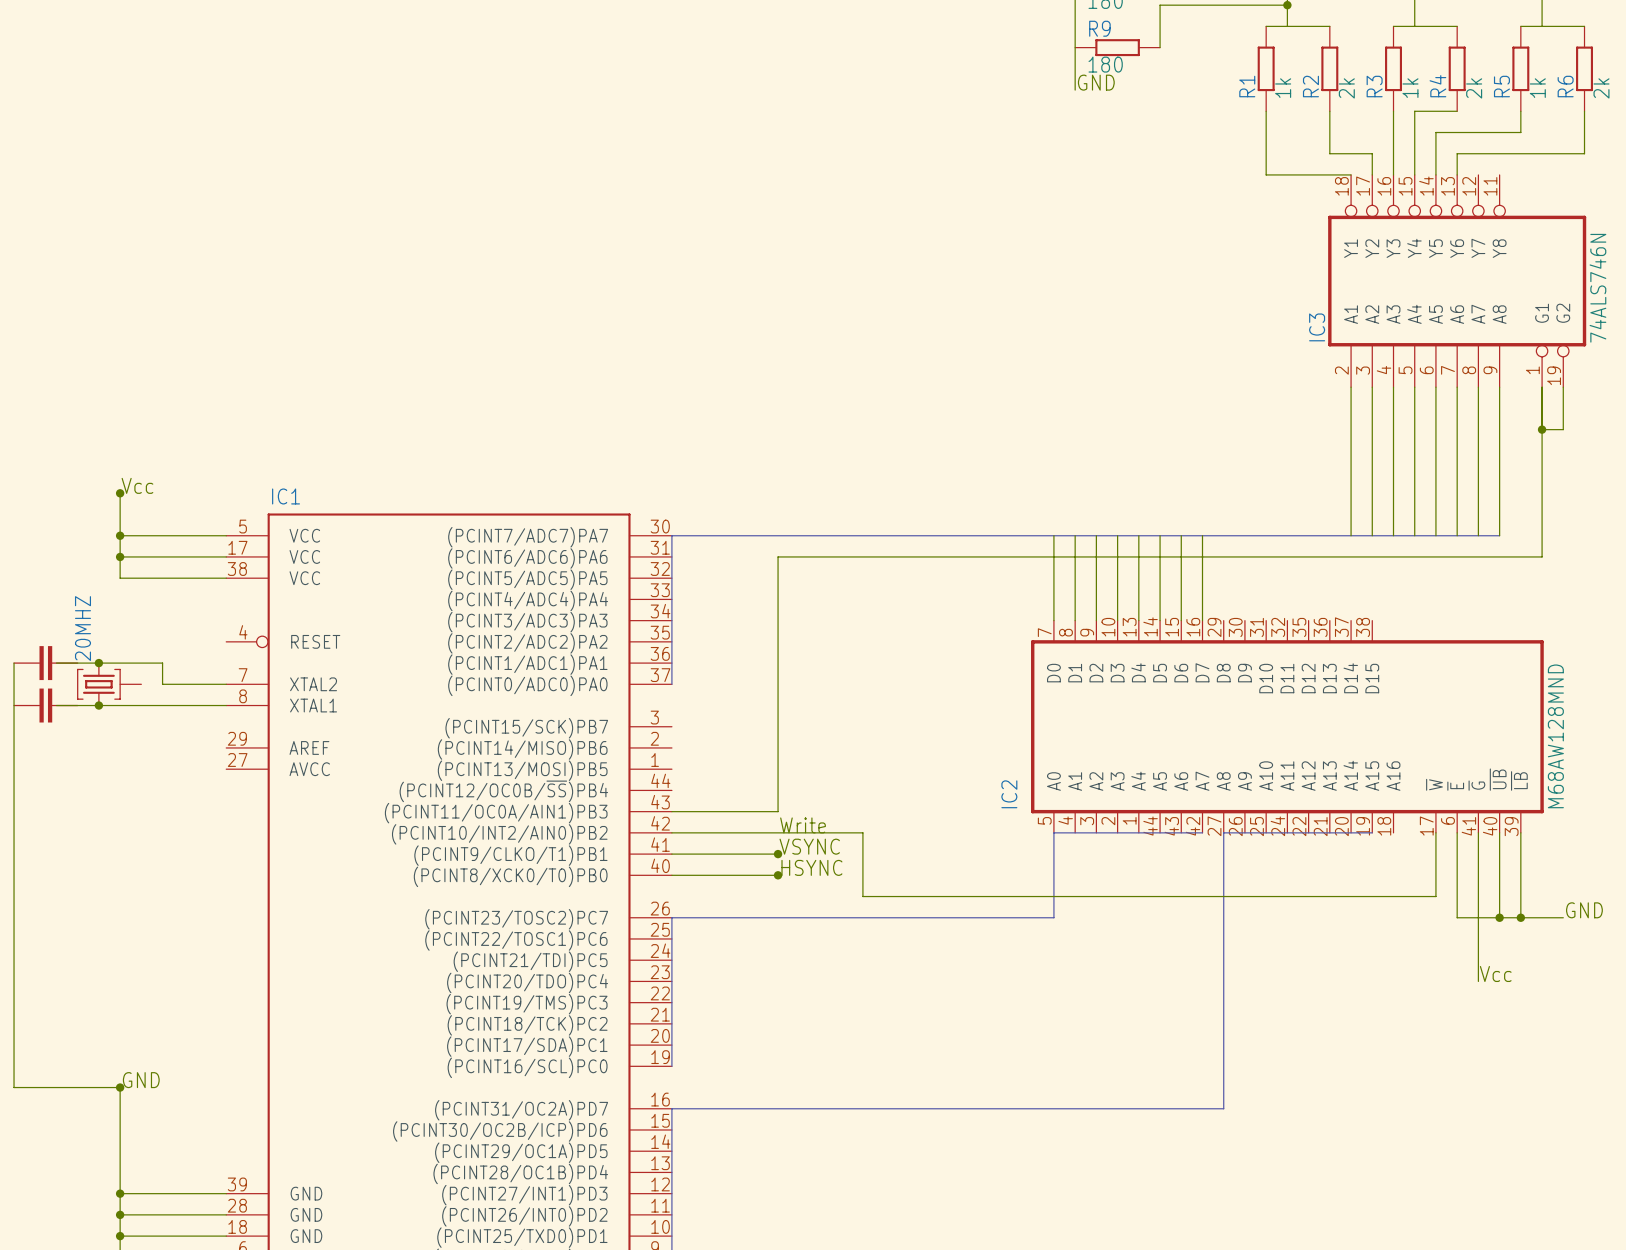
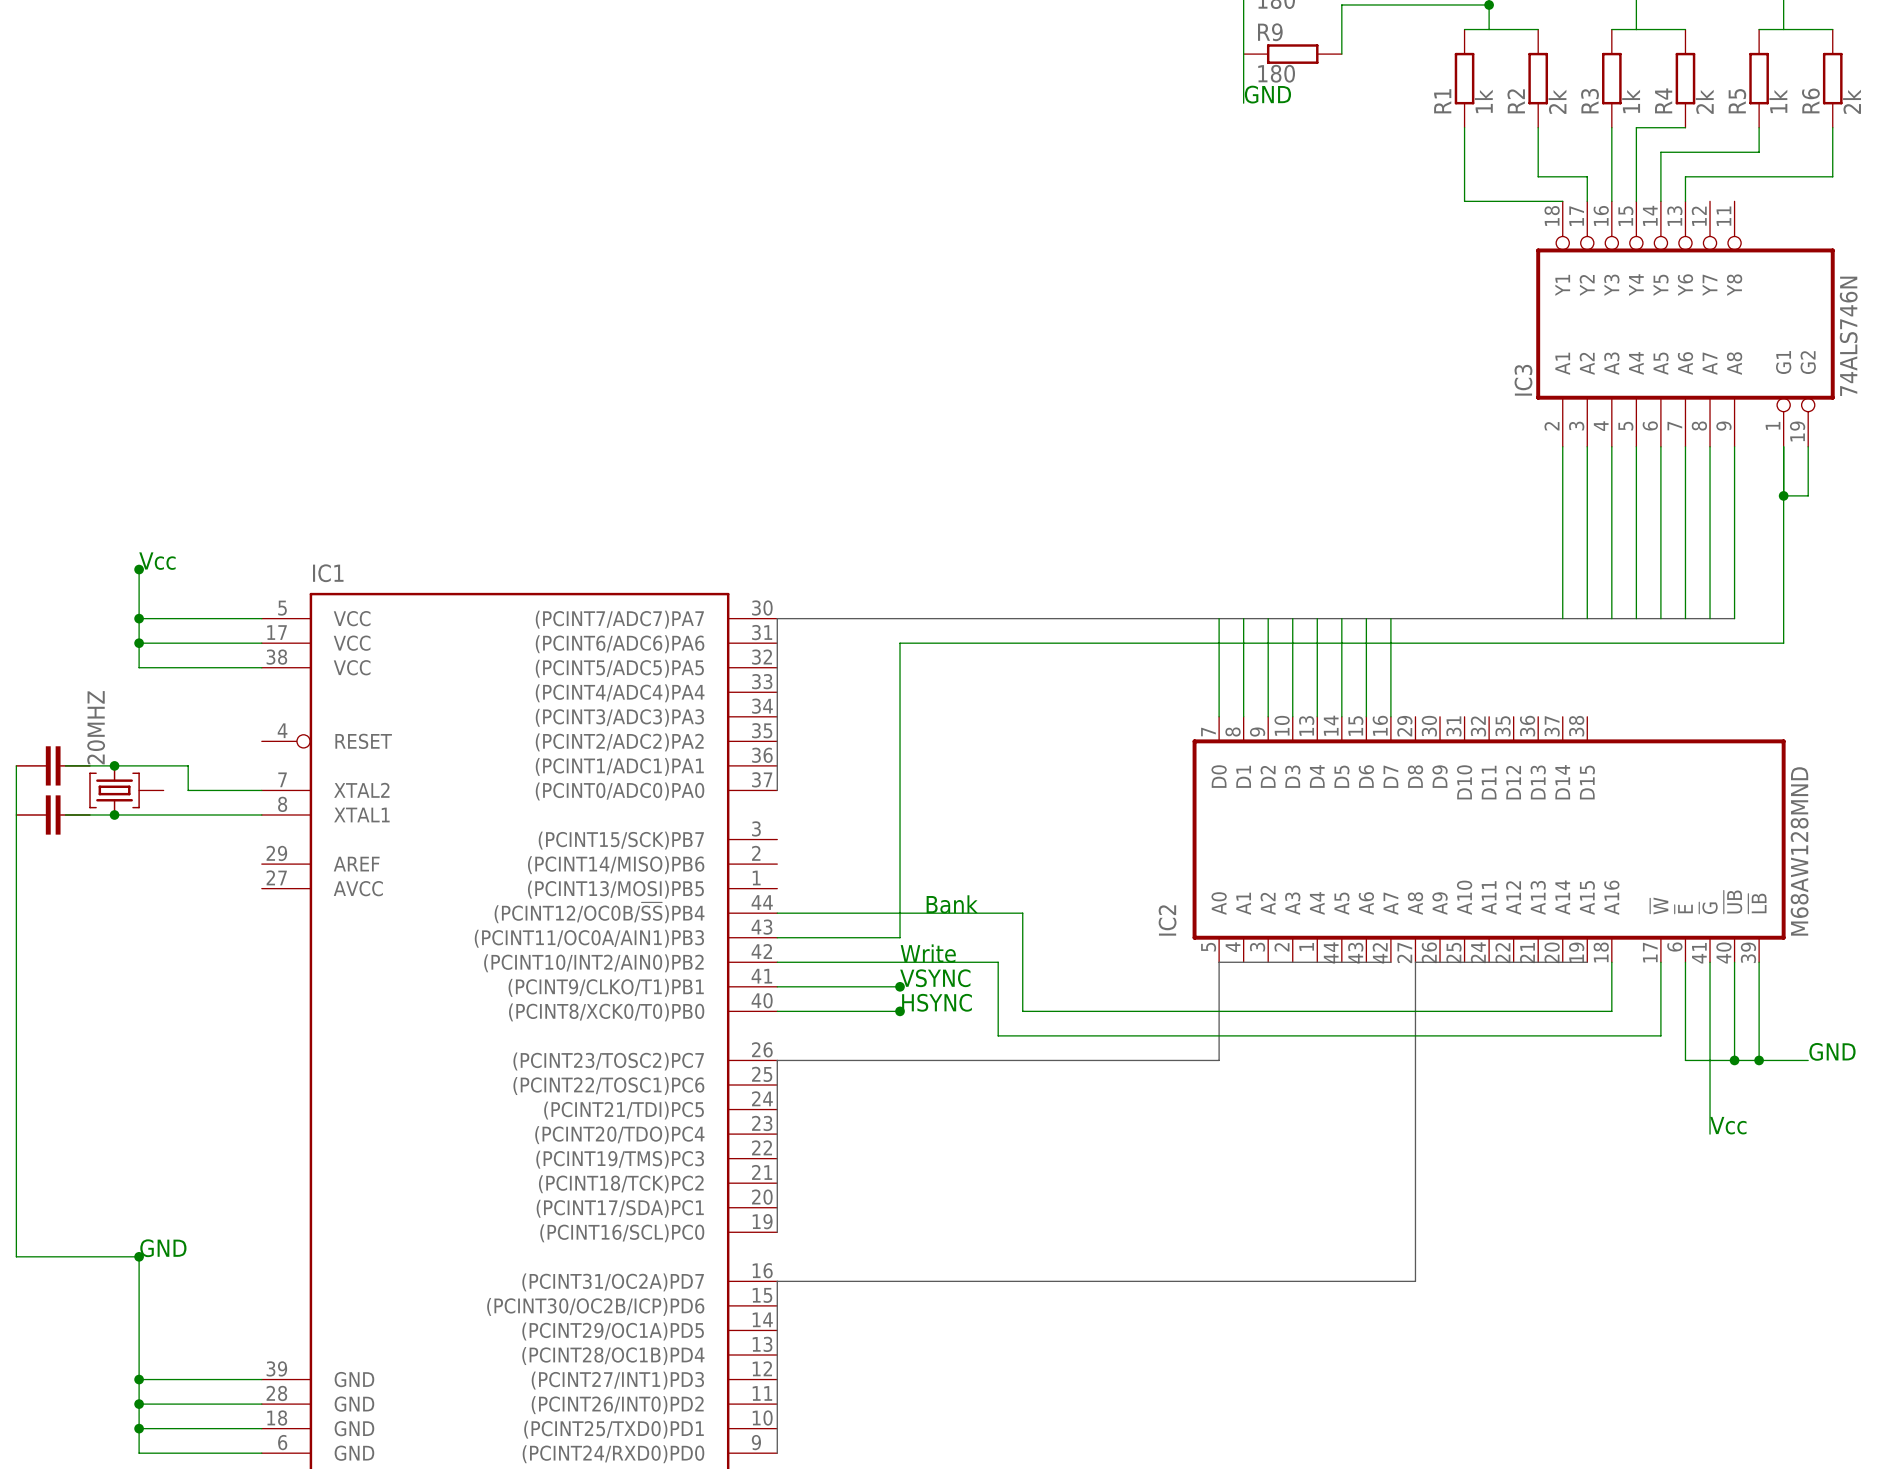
text: none -> Bank (952, 904)
wire: none -> (777, 913) (1022, 913) (1022, 1011) (1611, 1011) (1611, 962)

